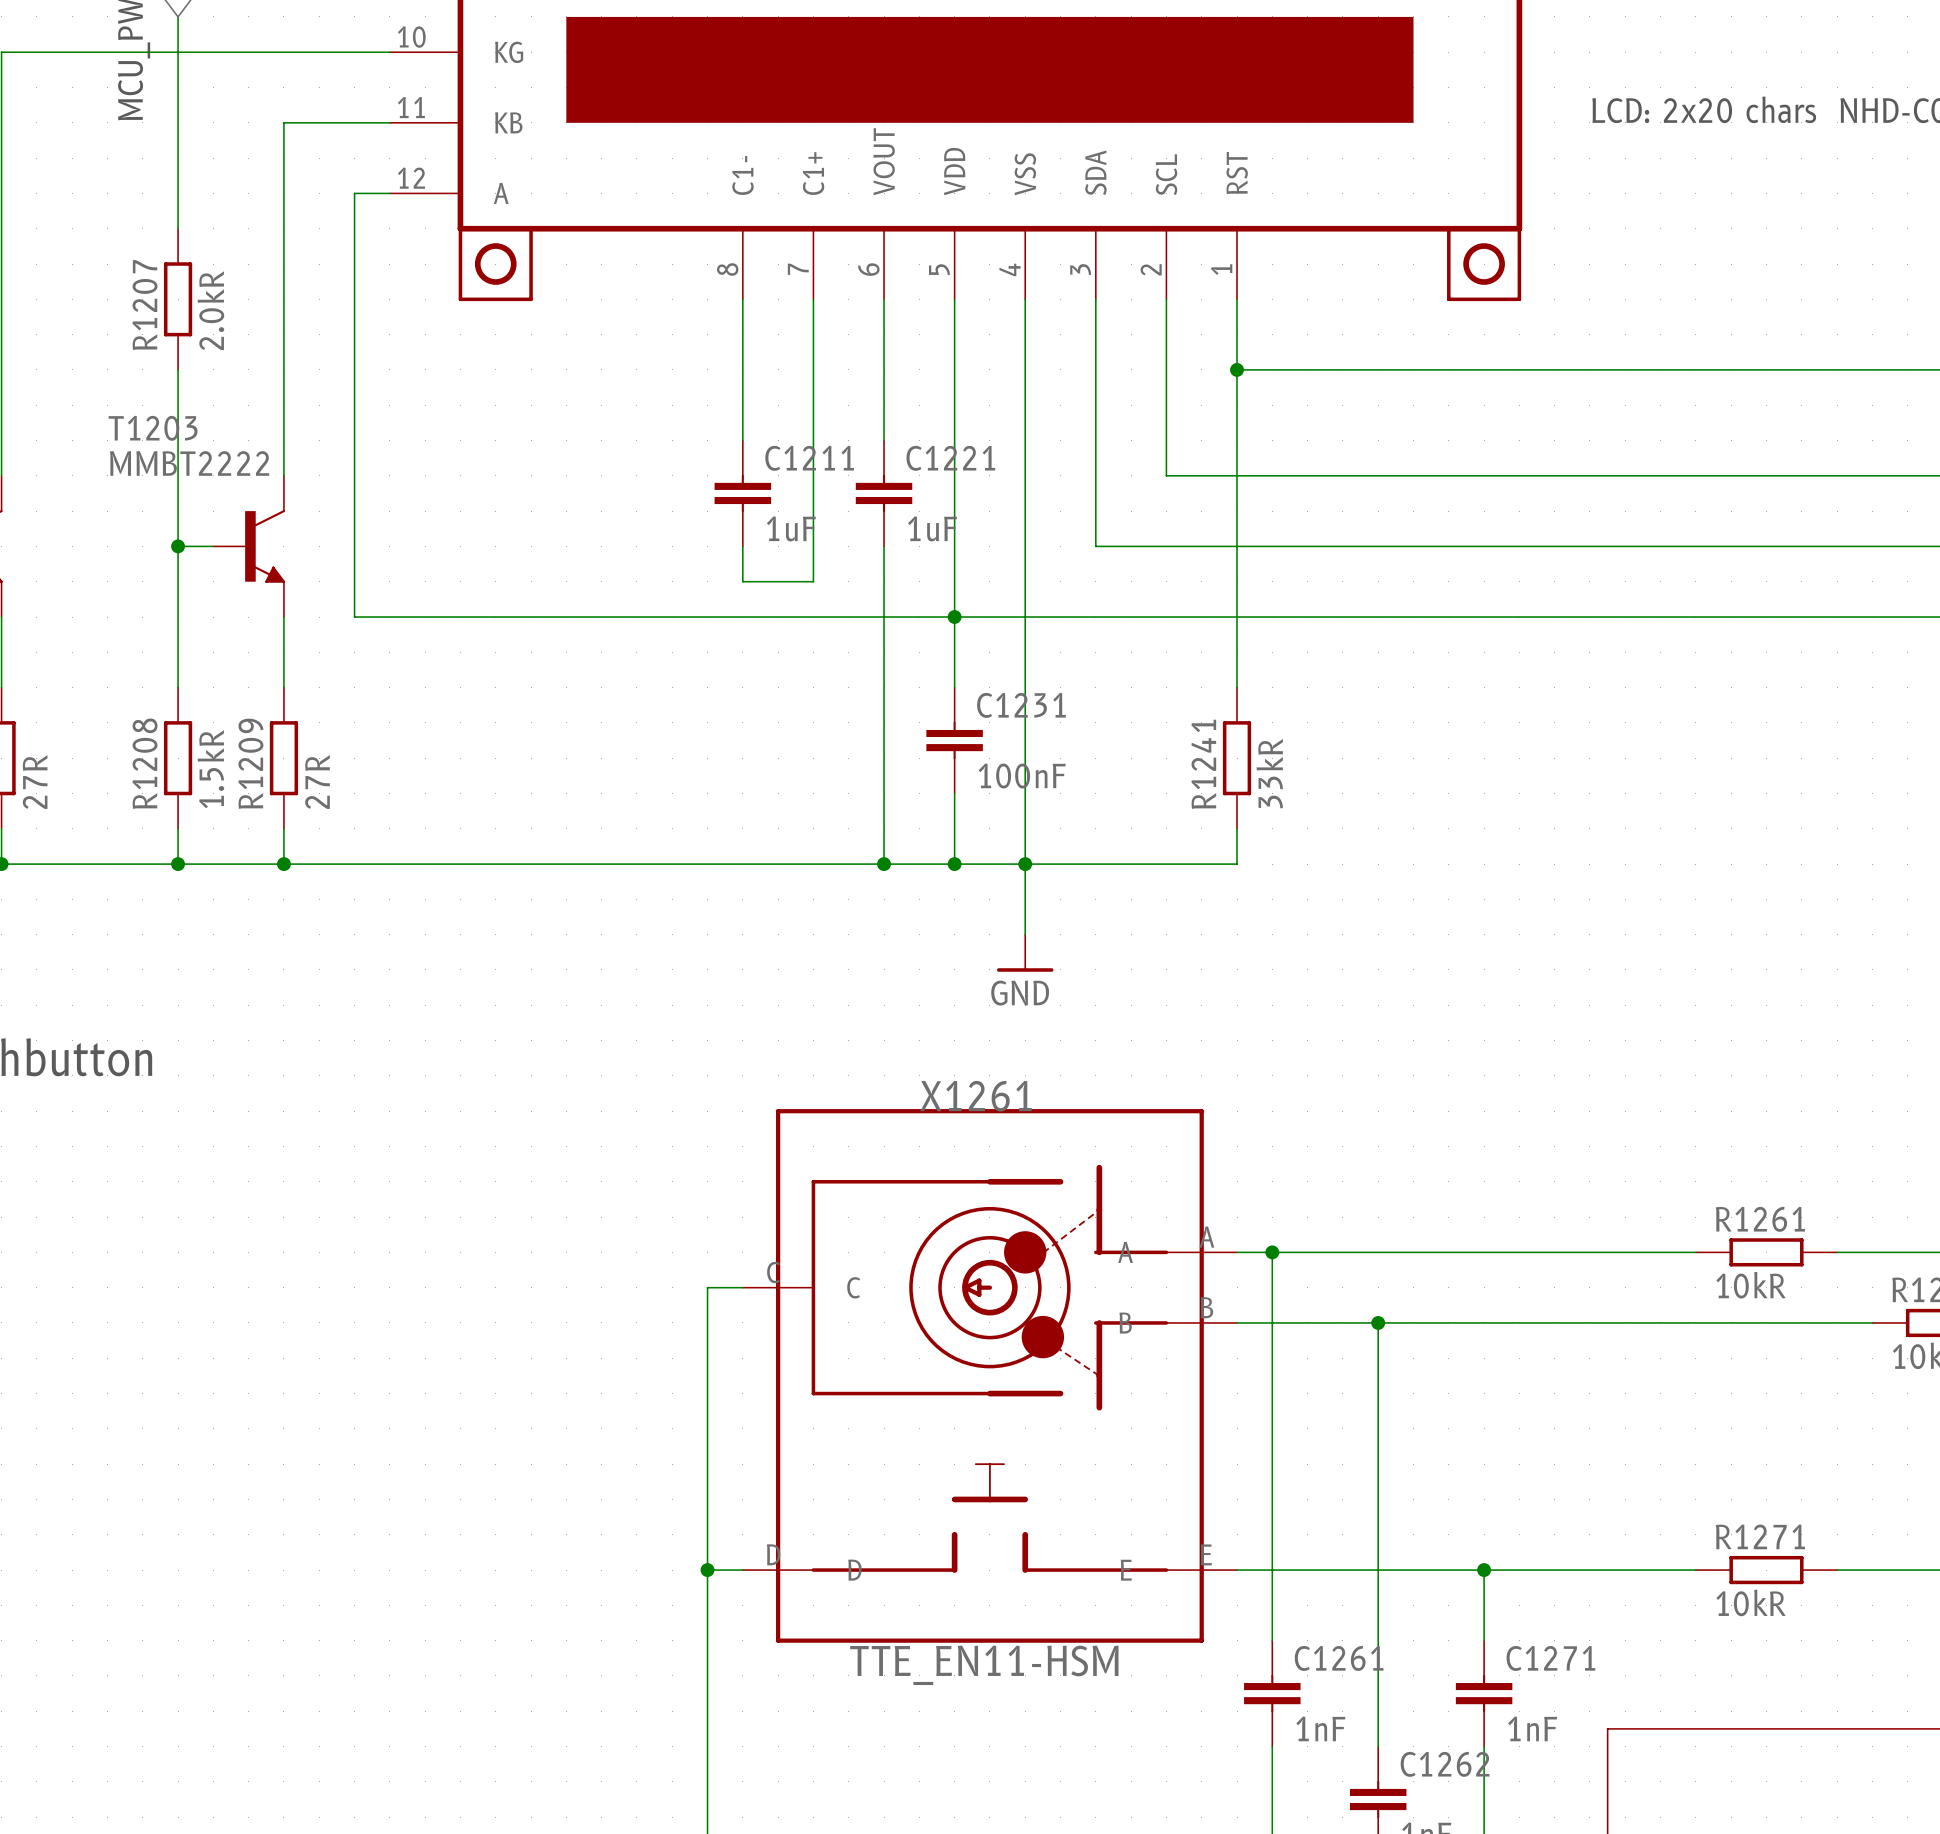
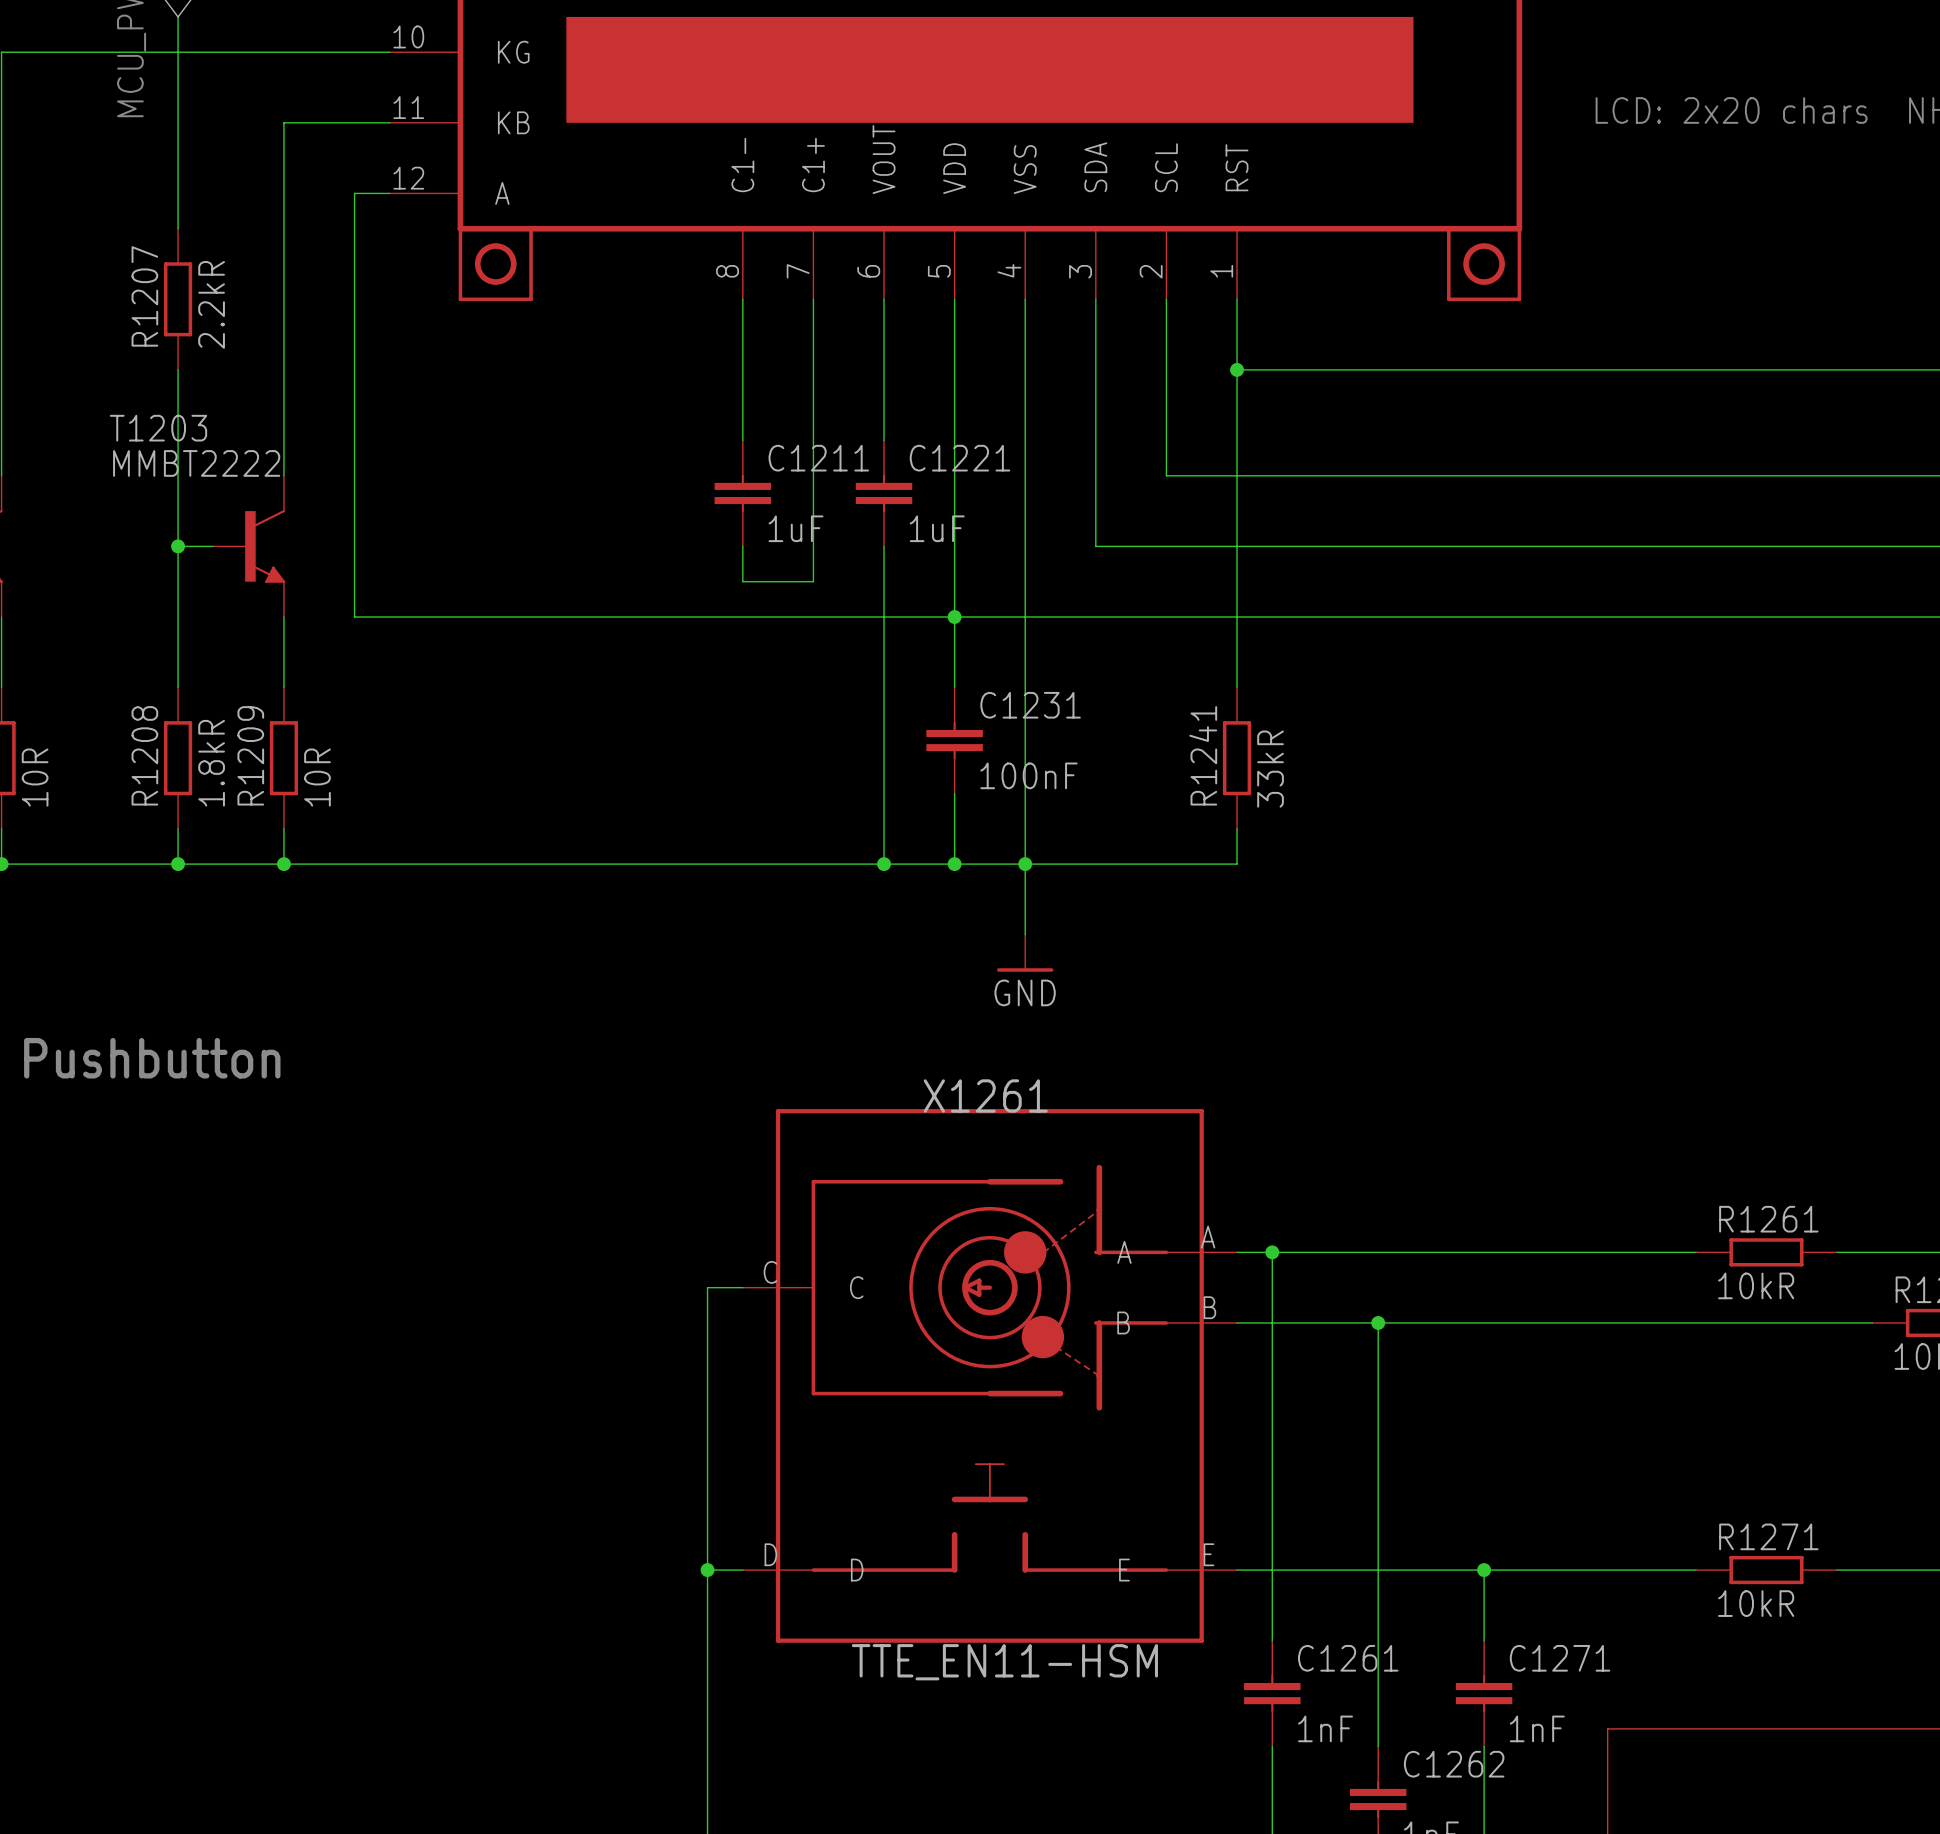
R1207 value: 2.0kR (210, 310) -> 2.2kR (211, 304)
R1208 value: 1.5kR (210, 769) -> 1.8kR (211, 763)
part value: 27R (35, 781) -> 10R (35, 777)
R1209 value: 27R (317, 781) -> 10R (317, 777)

